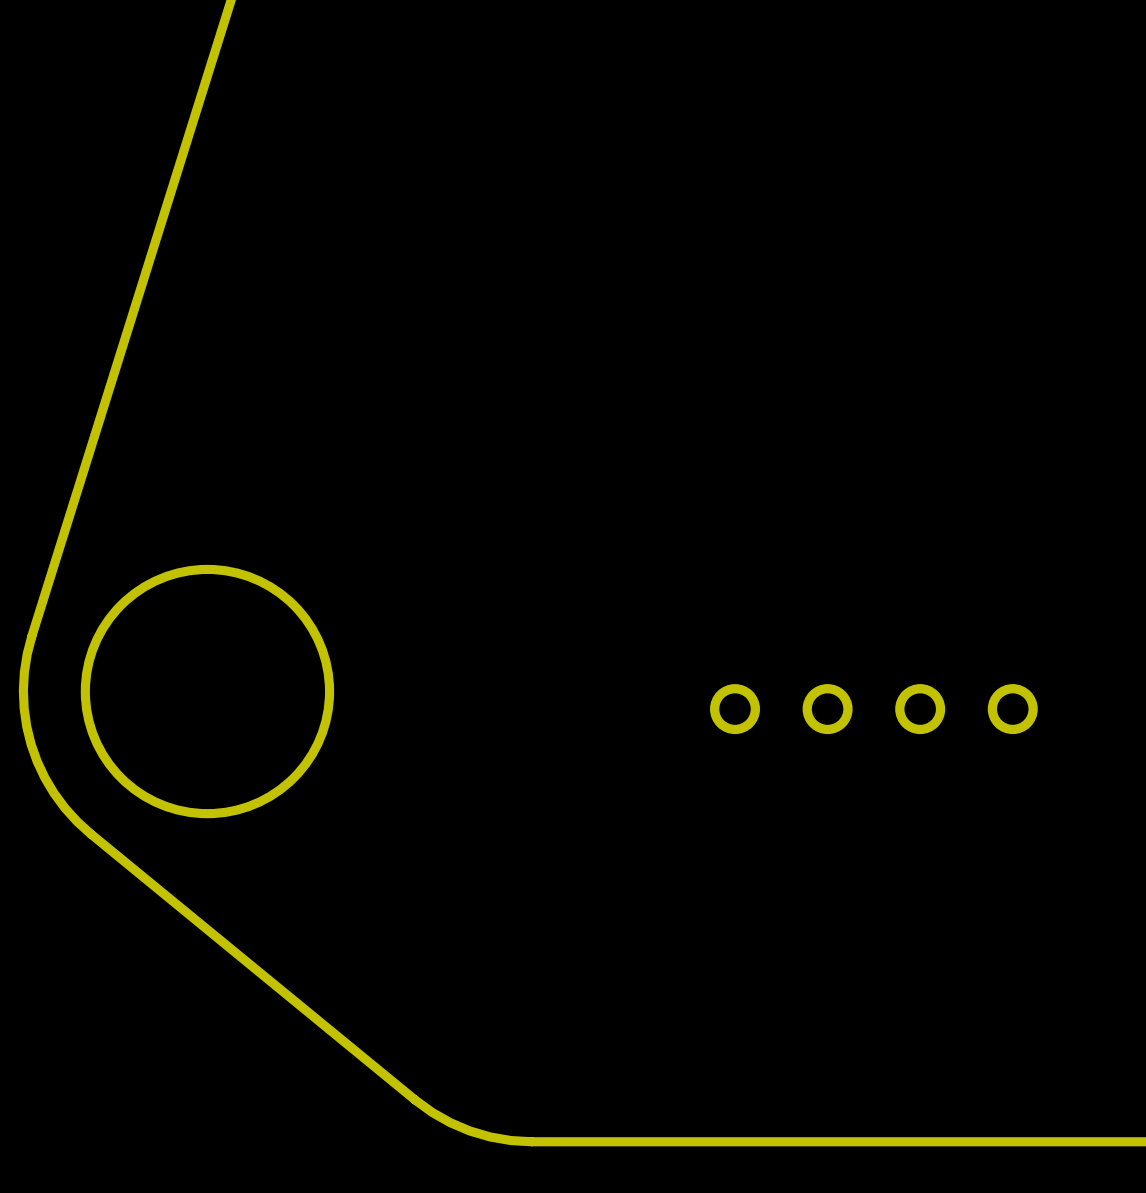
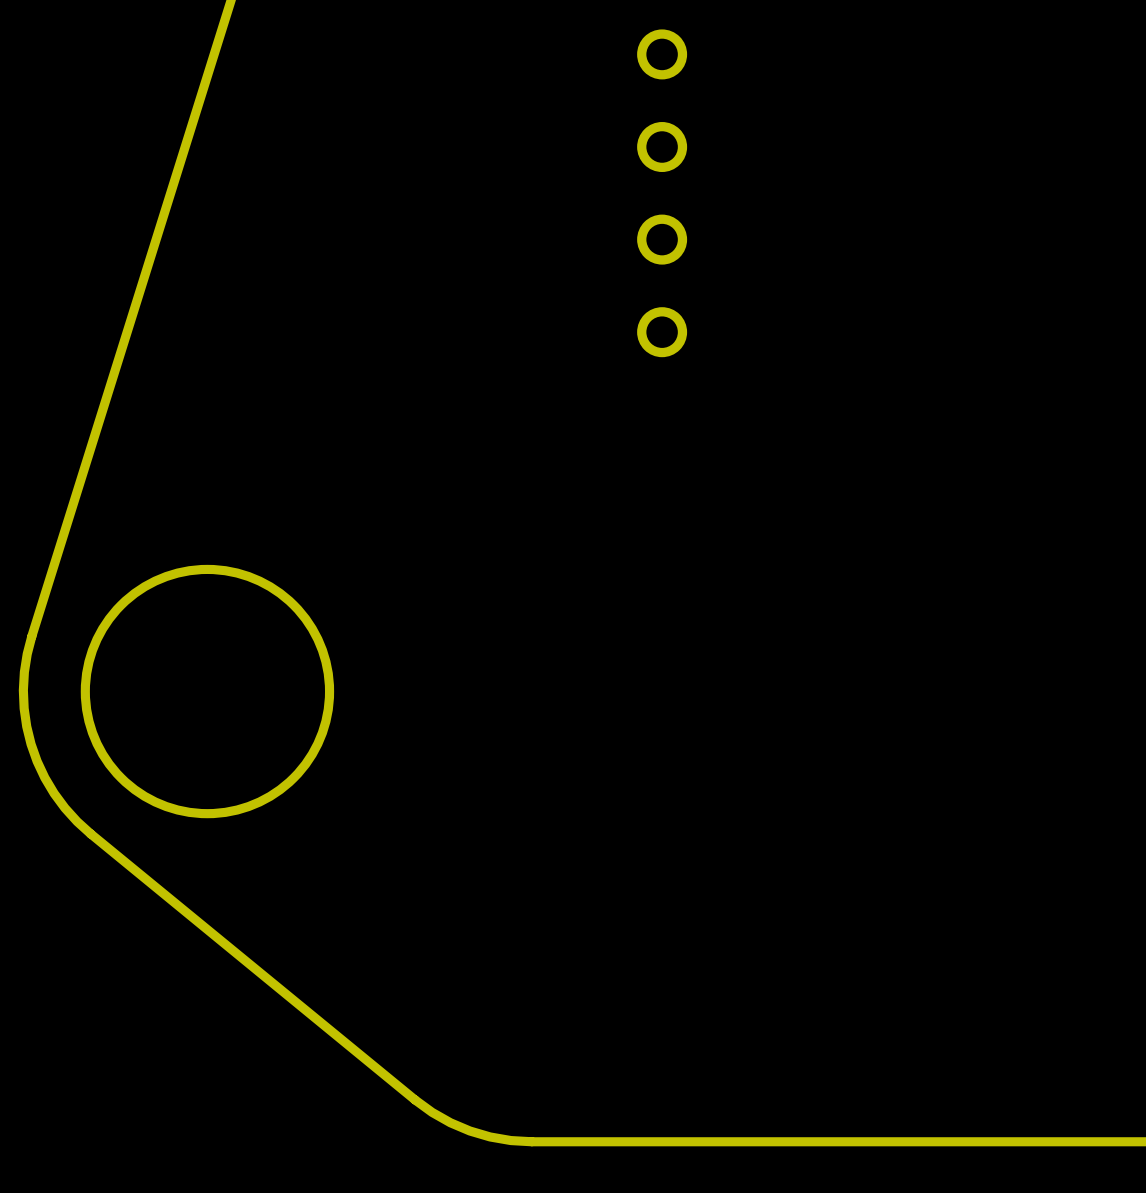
part rotation: 0° (873, 709) -> 90° clockwise (662, 193)
part position: (873, 709) -> (662, 193)

